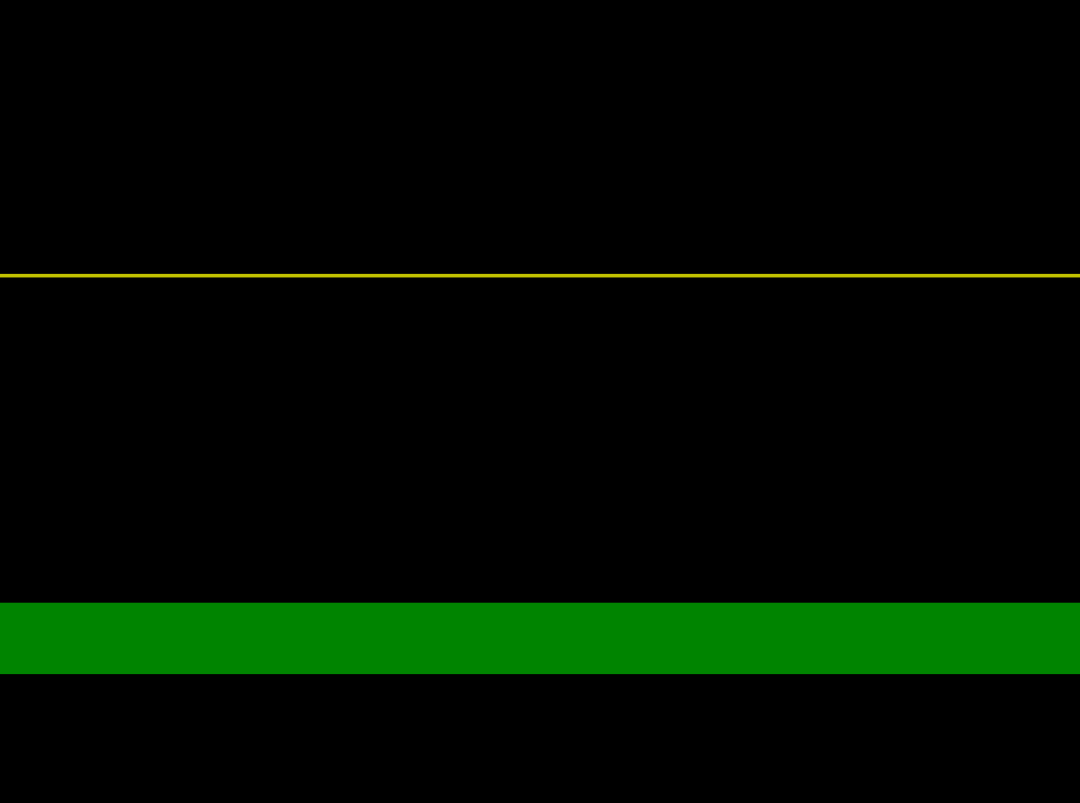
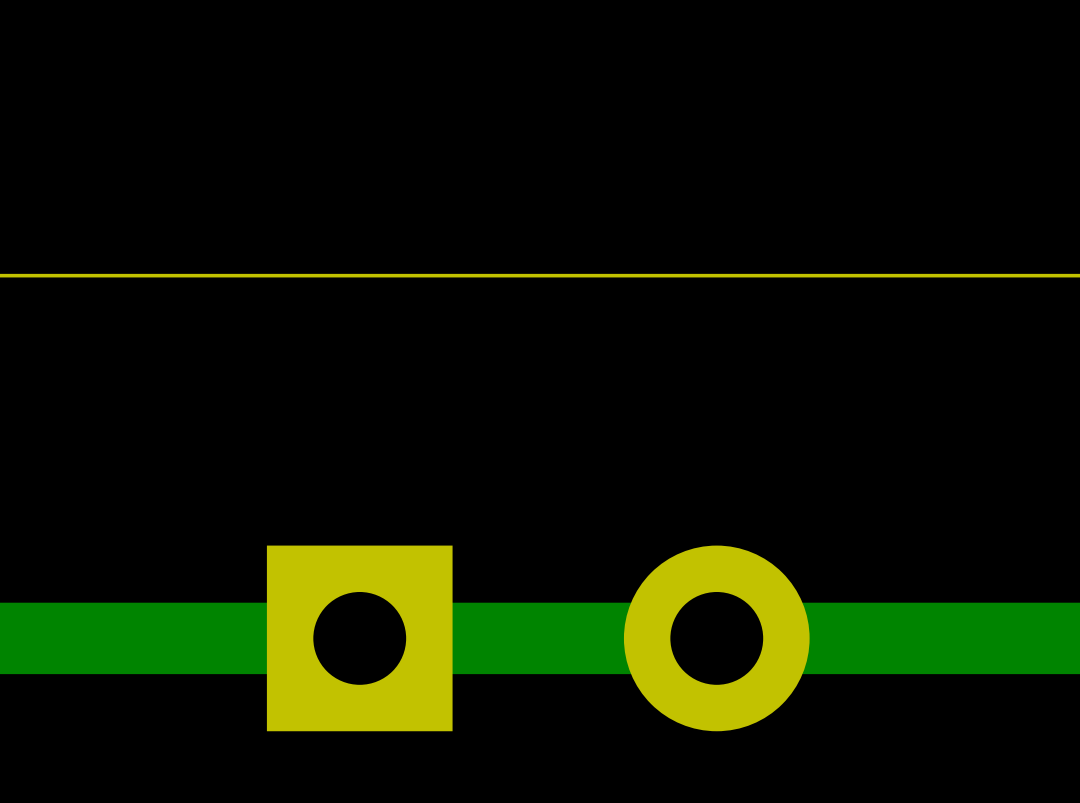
part: none -> (538, 638)

